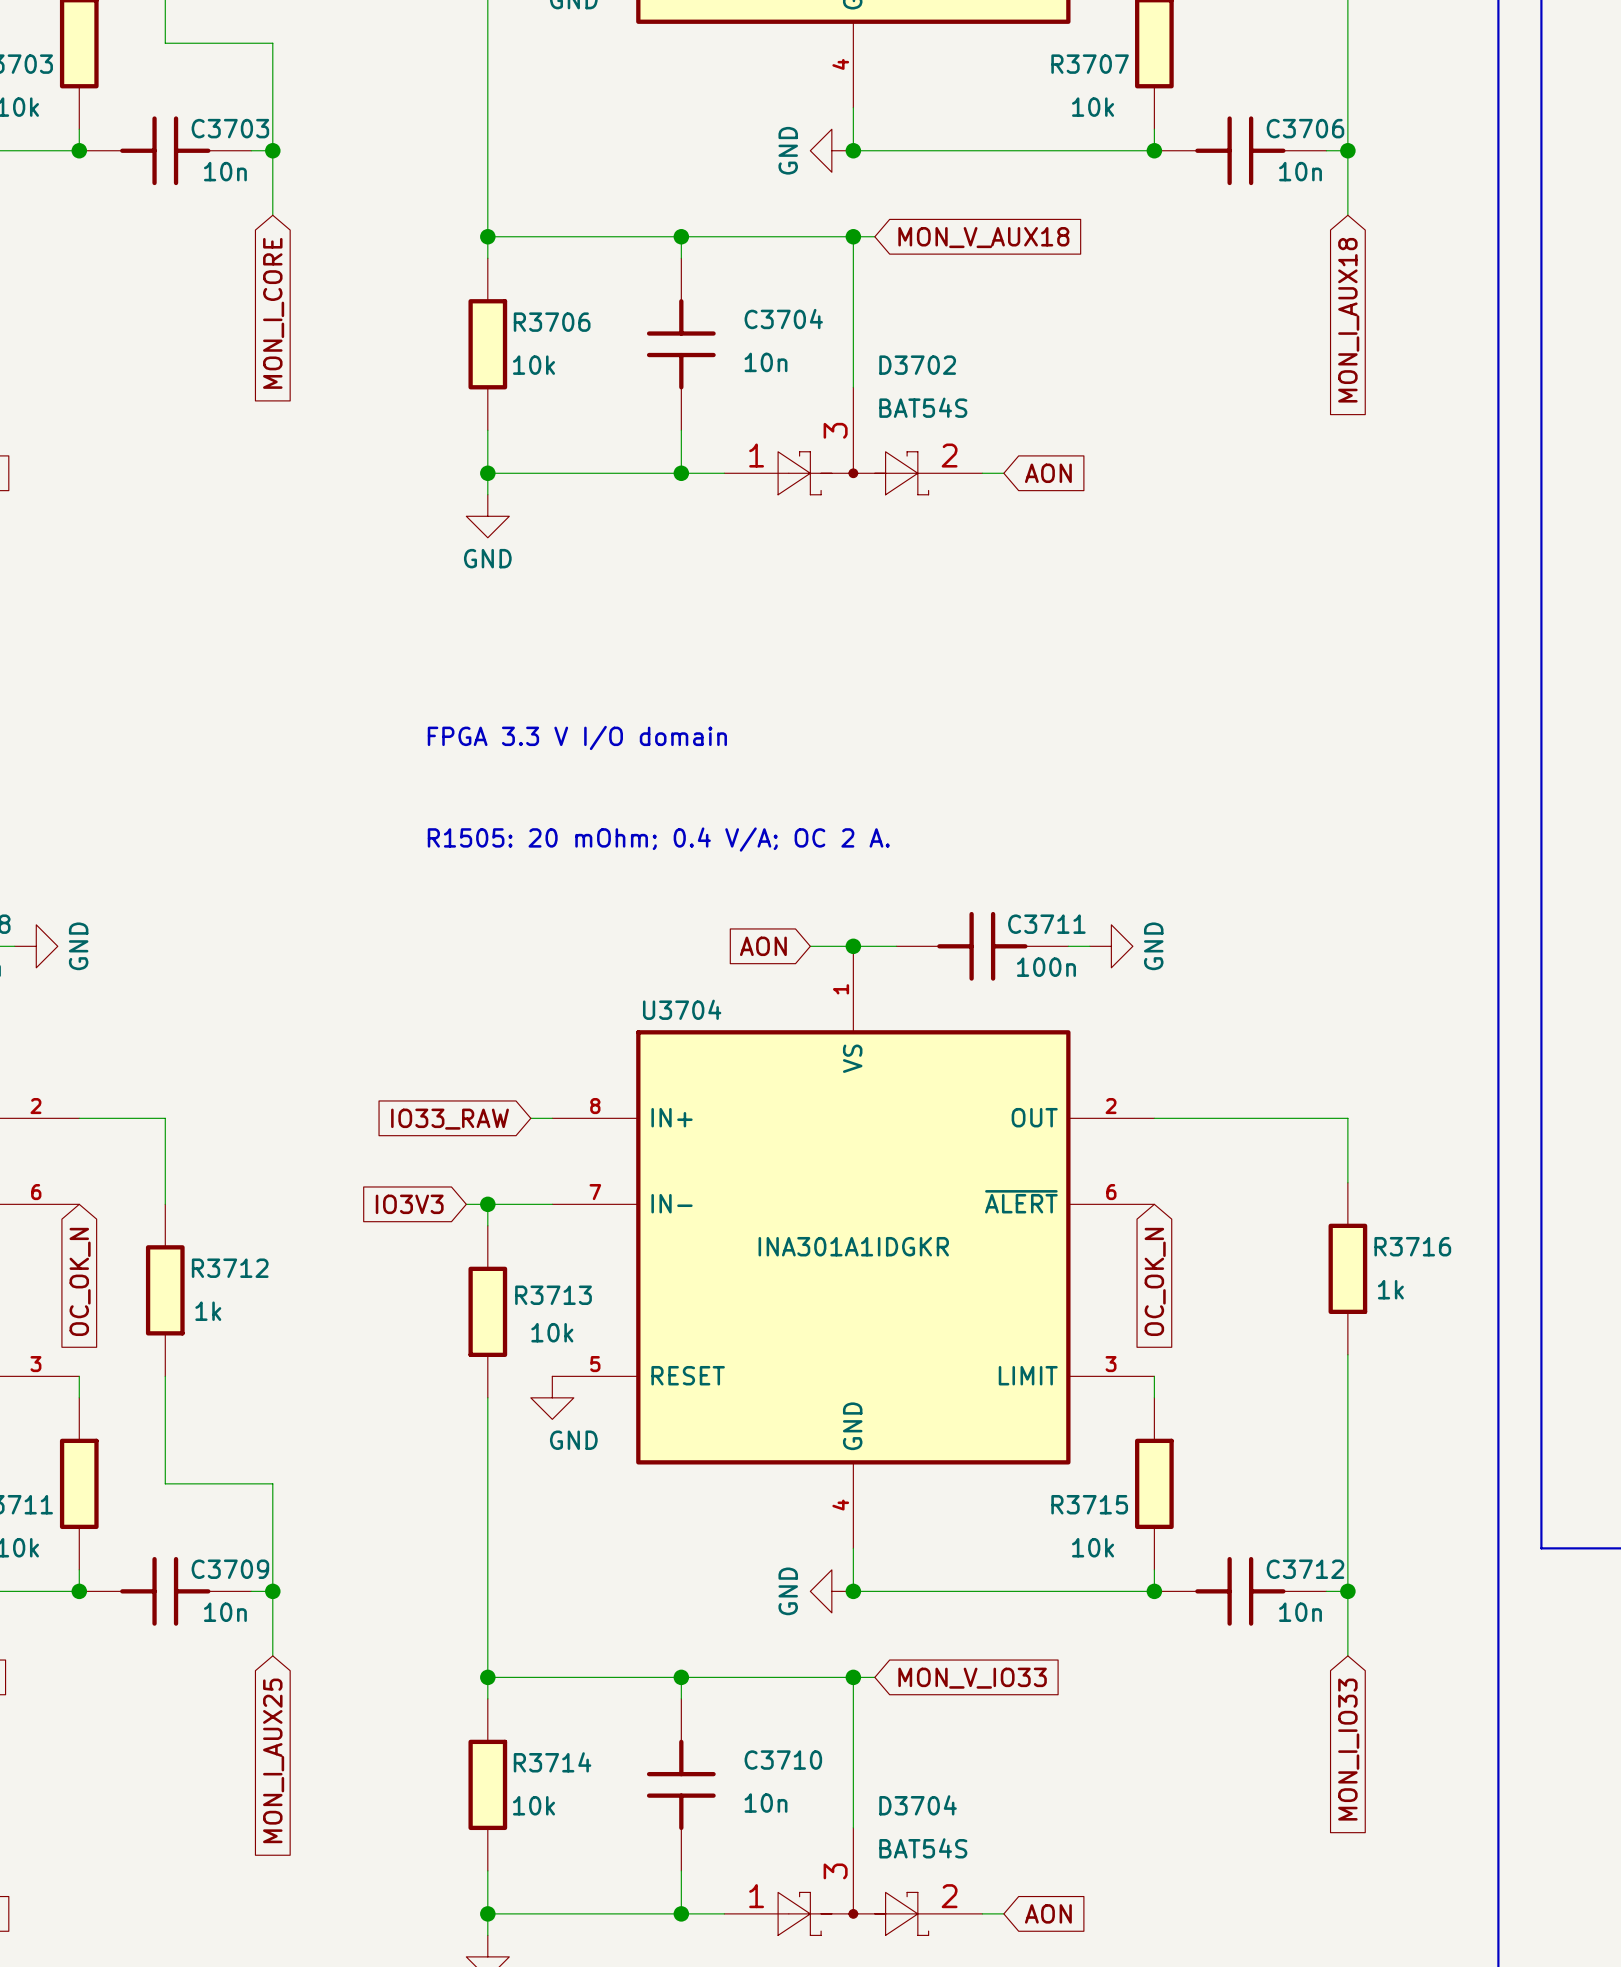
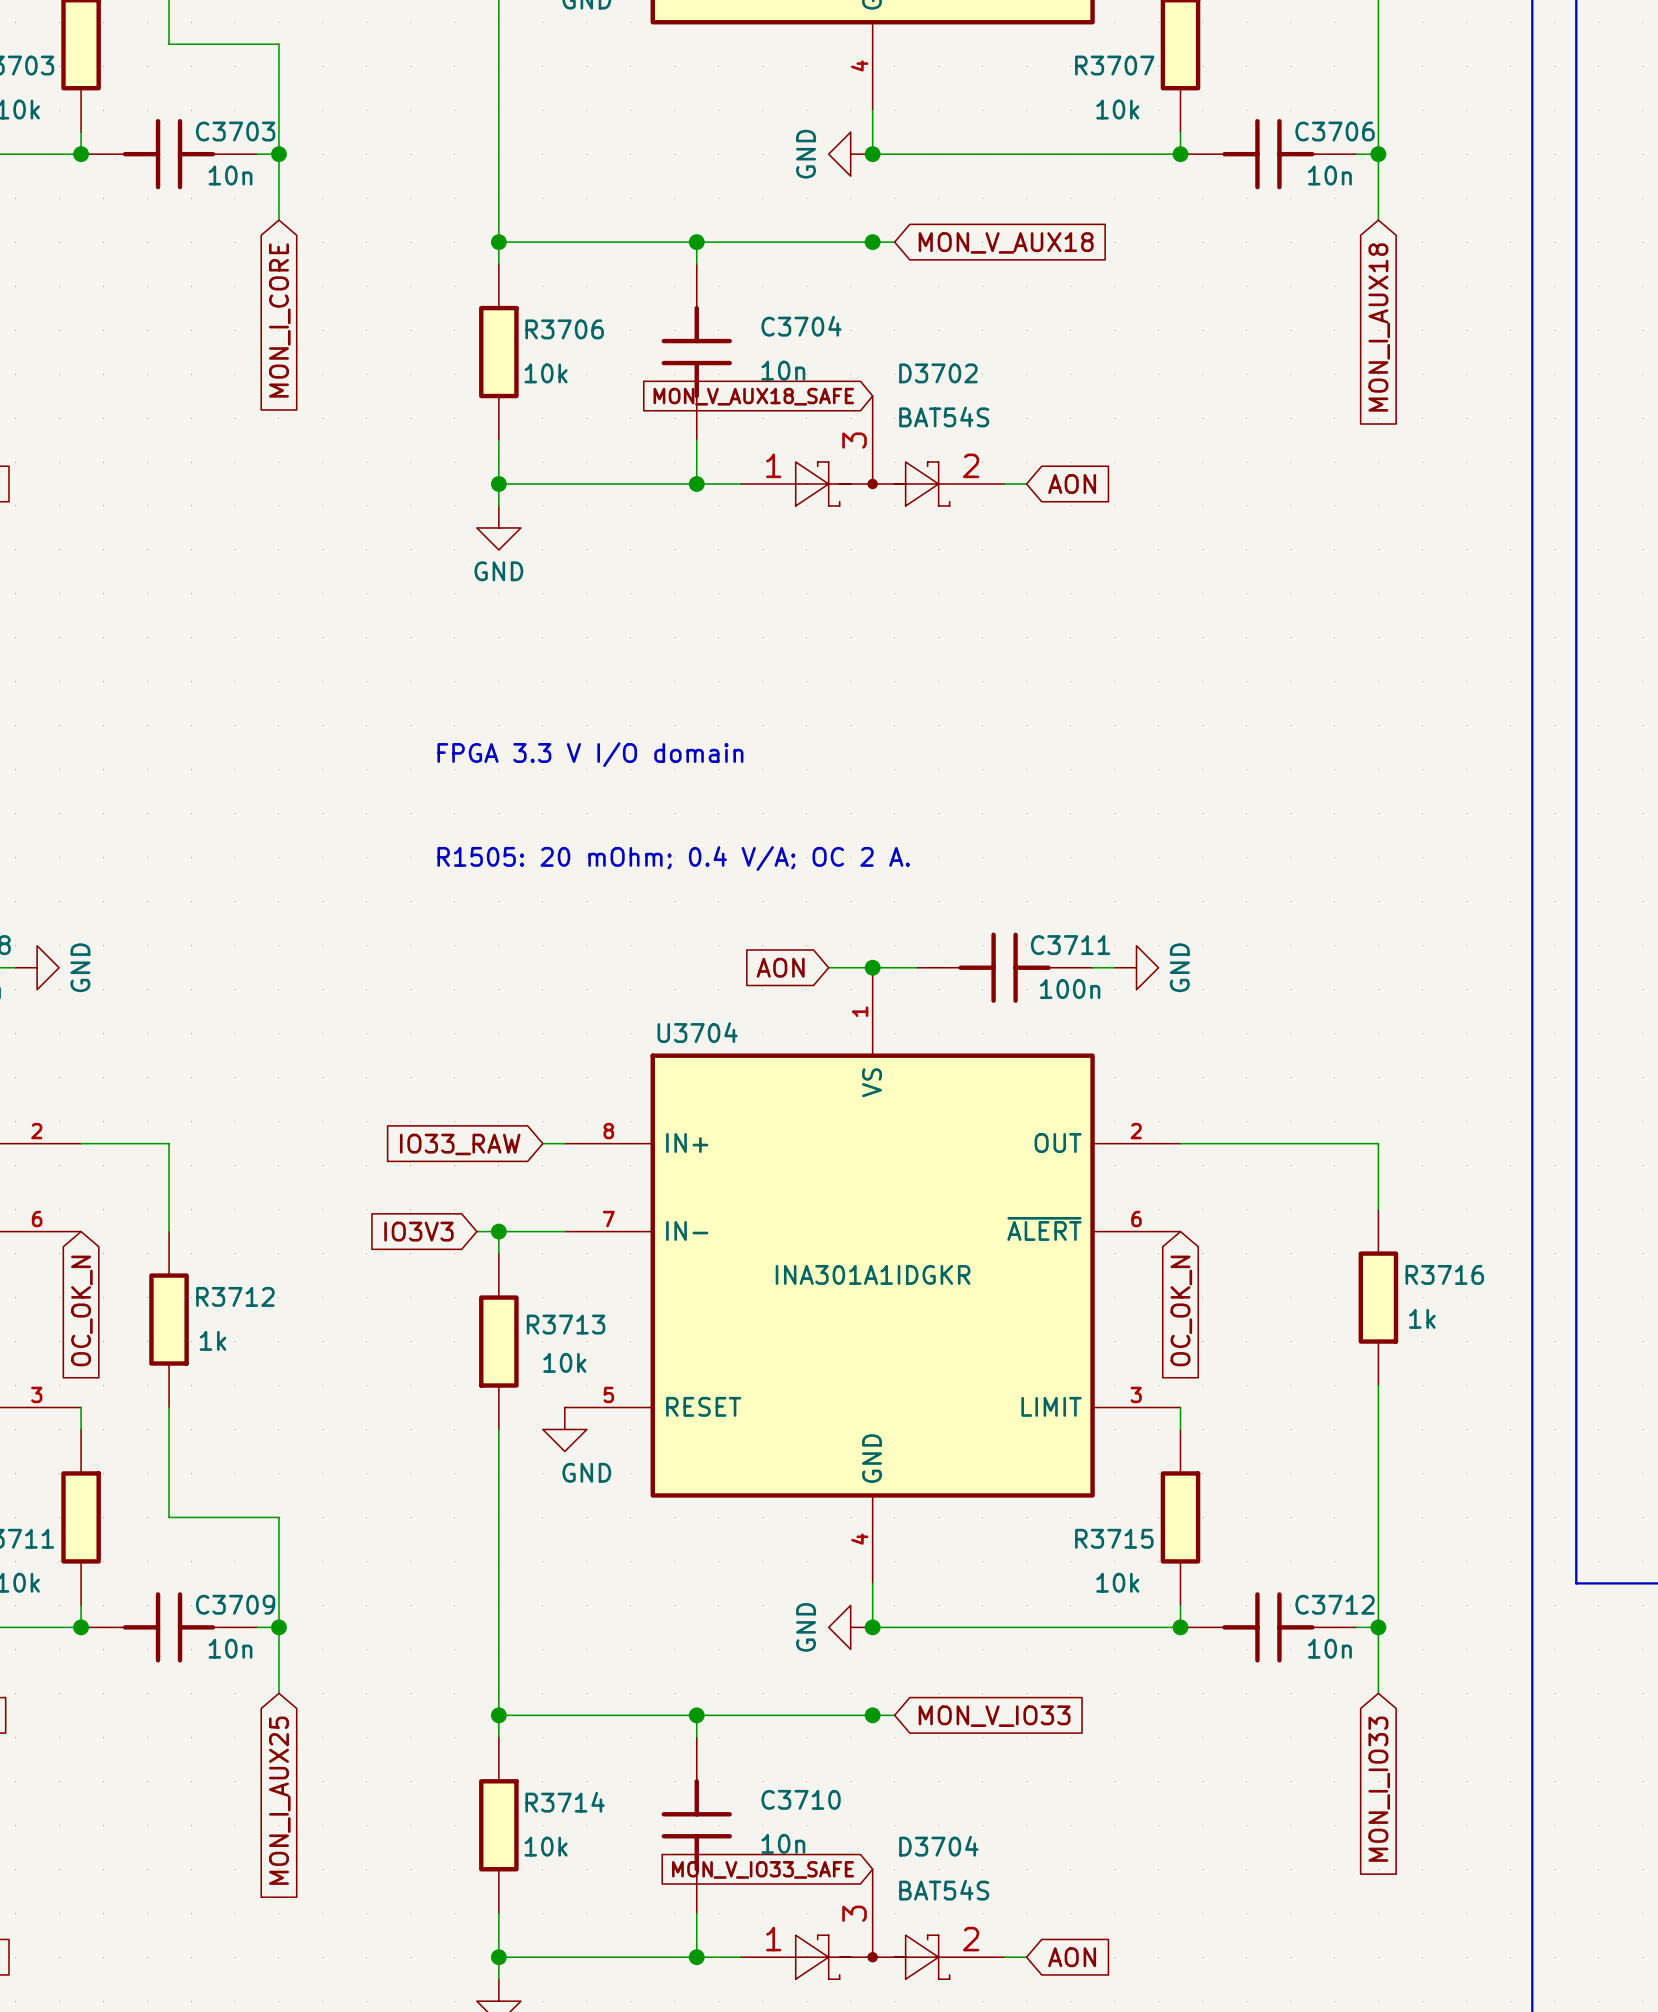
wire: (853, 236) (853, 387) -> none
global label: none -> MON_V_AUX18_SAFE (753, 396)
wire: (853, 1677) (853, 1827) -> none
global label: none -> MON_V_IO33_SAFE (763, 1869)

